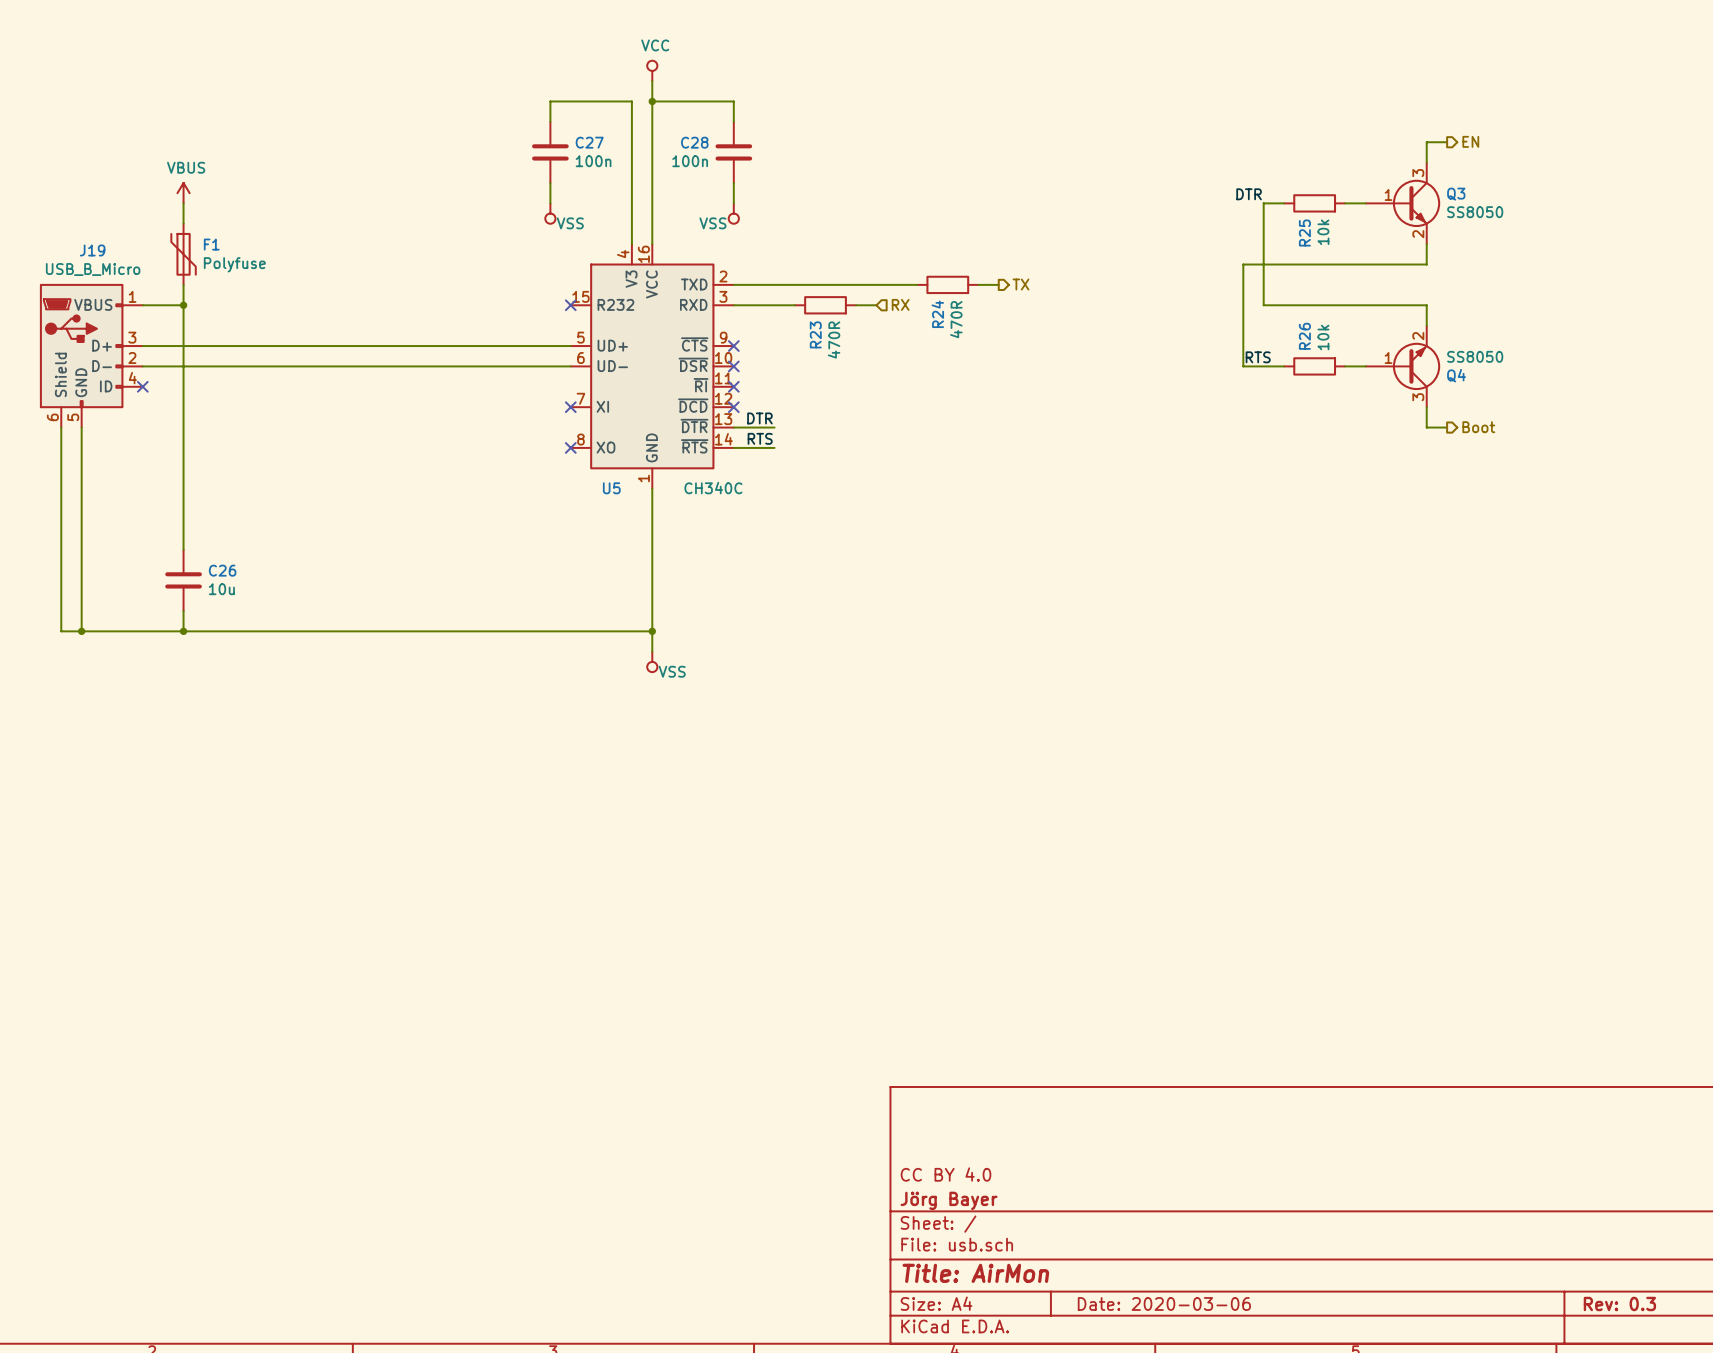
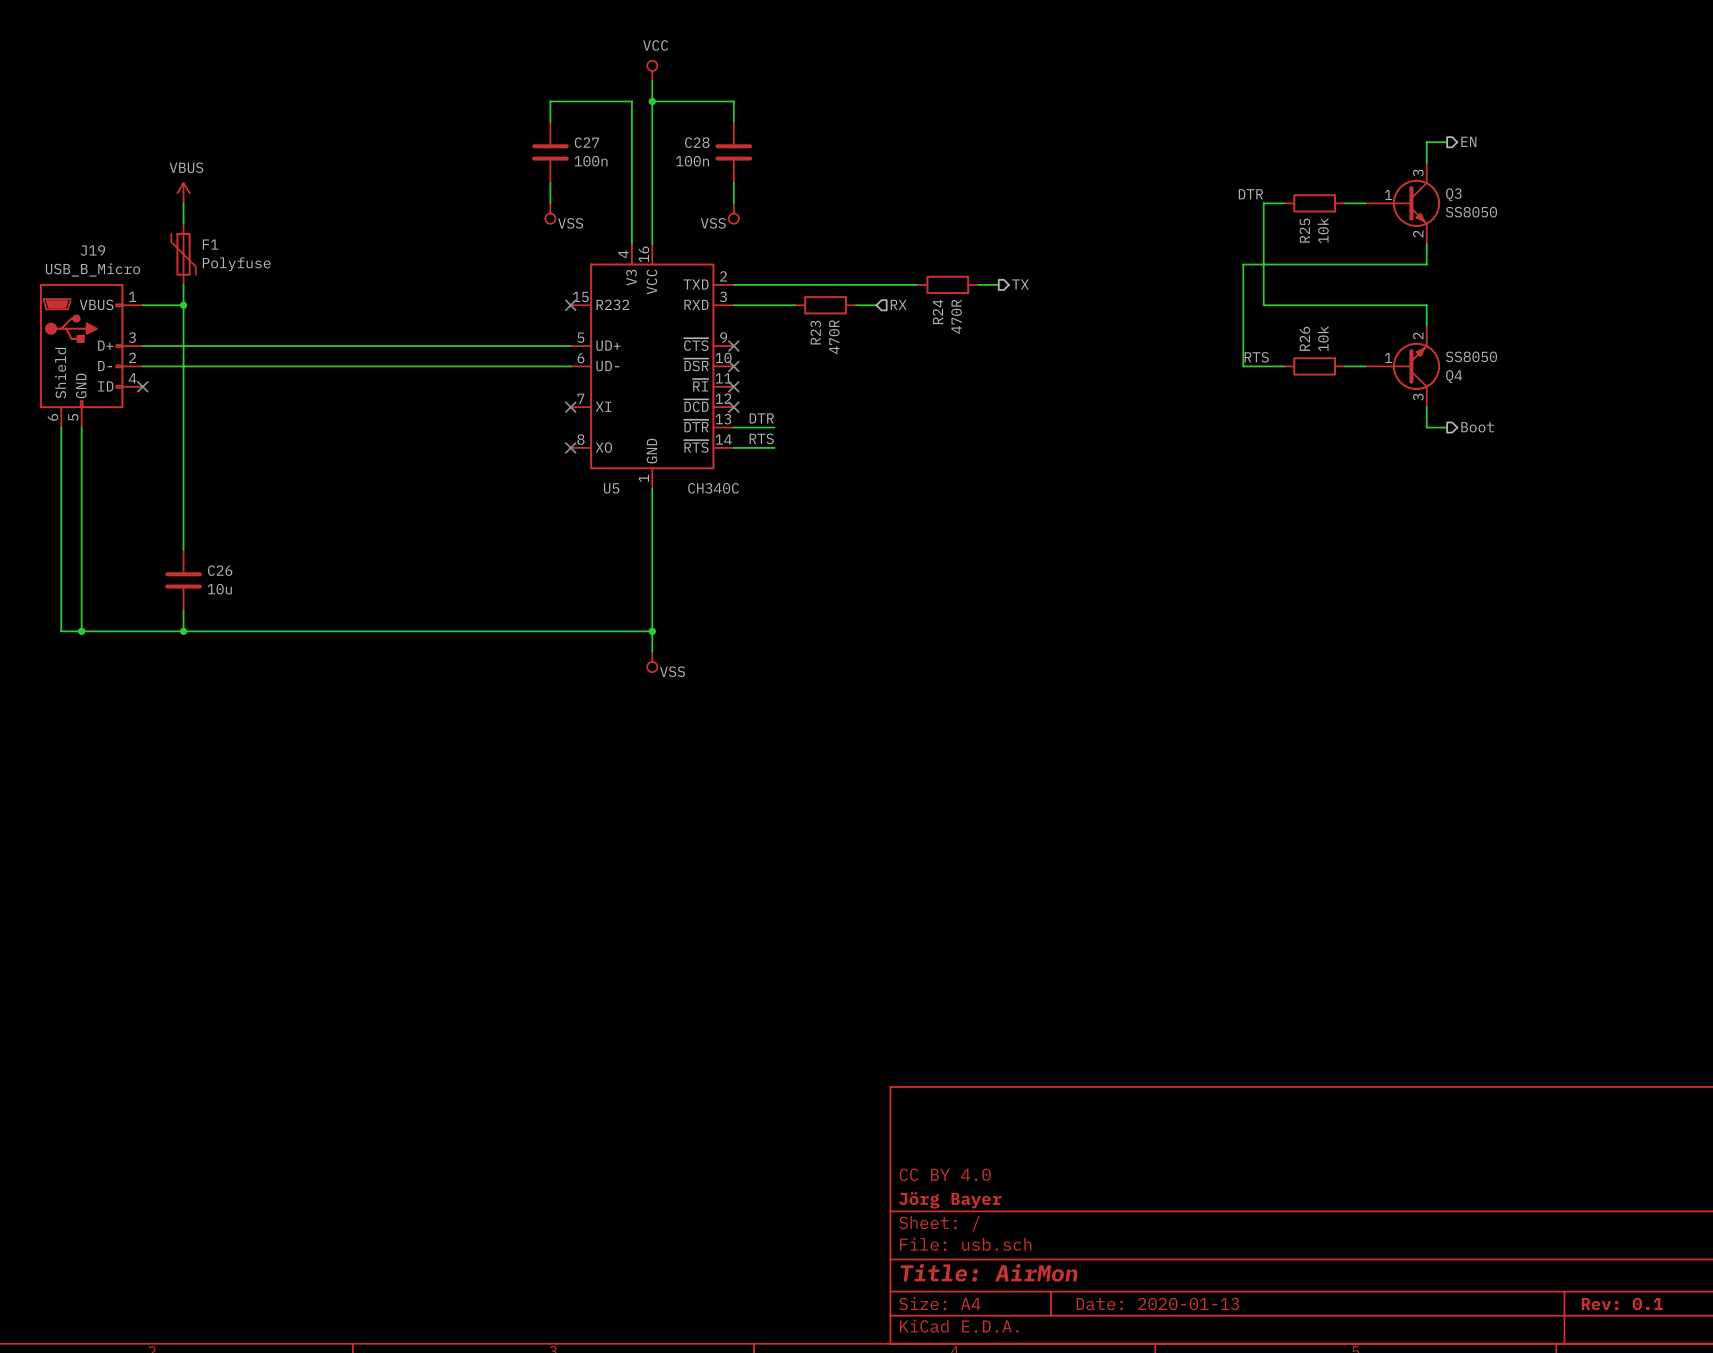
title block: Date: 2020-03-06 (1164, 1303) -> Date: 2020-01-13 (1157, 1303)
title block: Rev: 0.3 (1619, 1303) -> Rev: 0.1 (1622, 1303)

